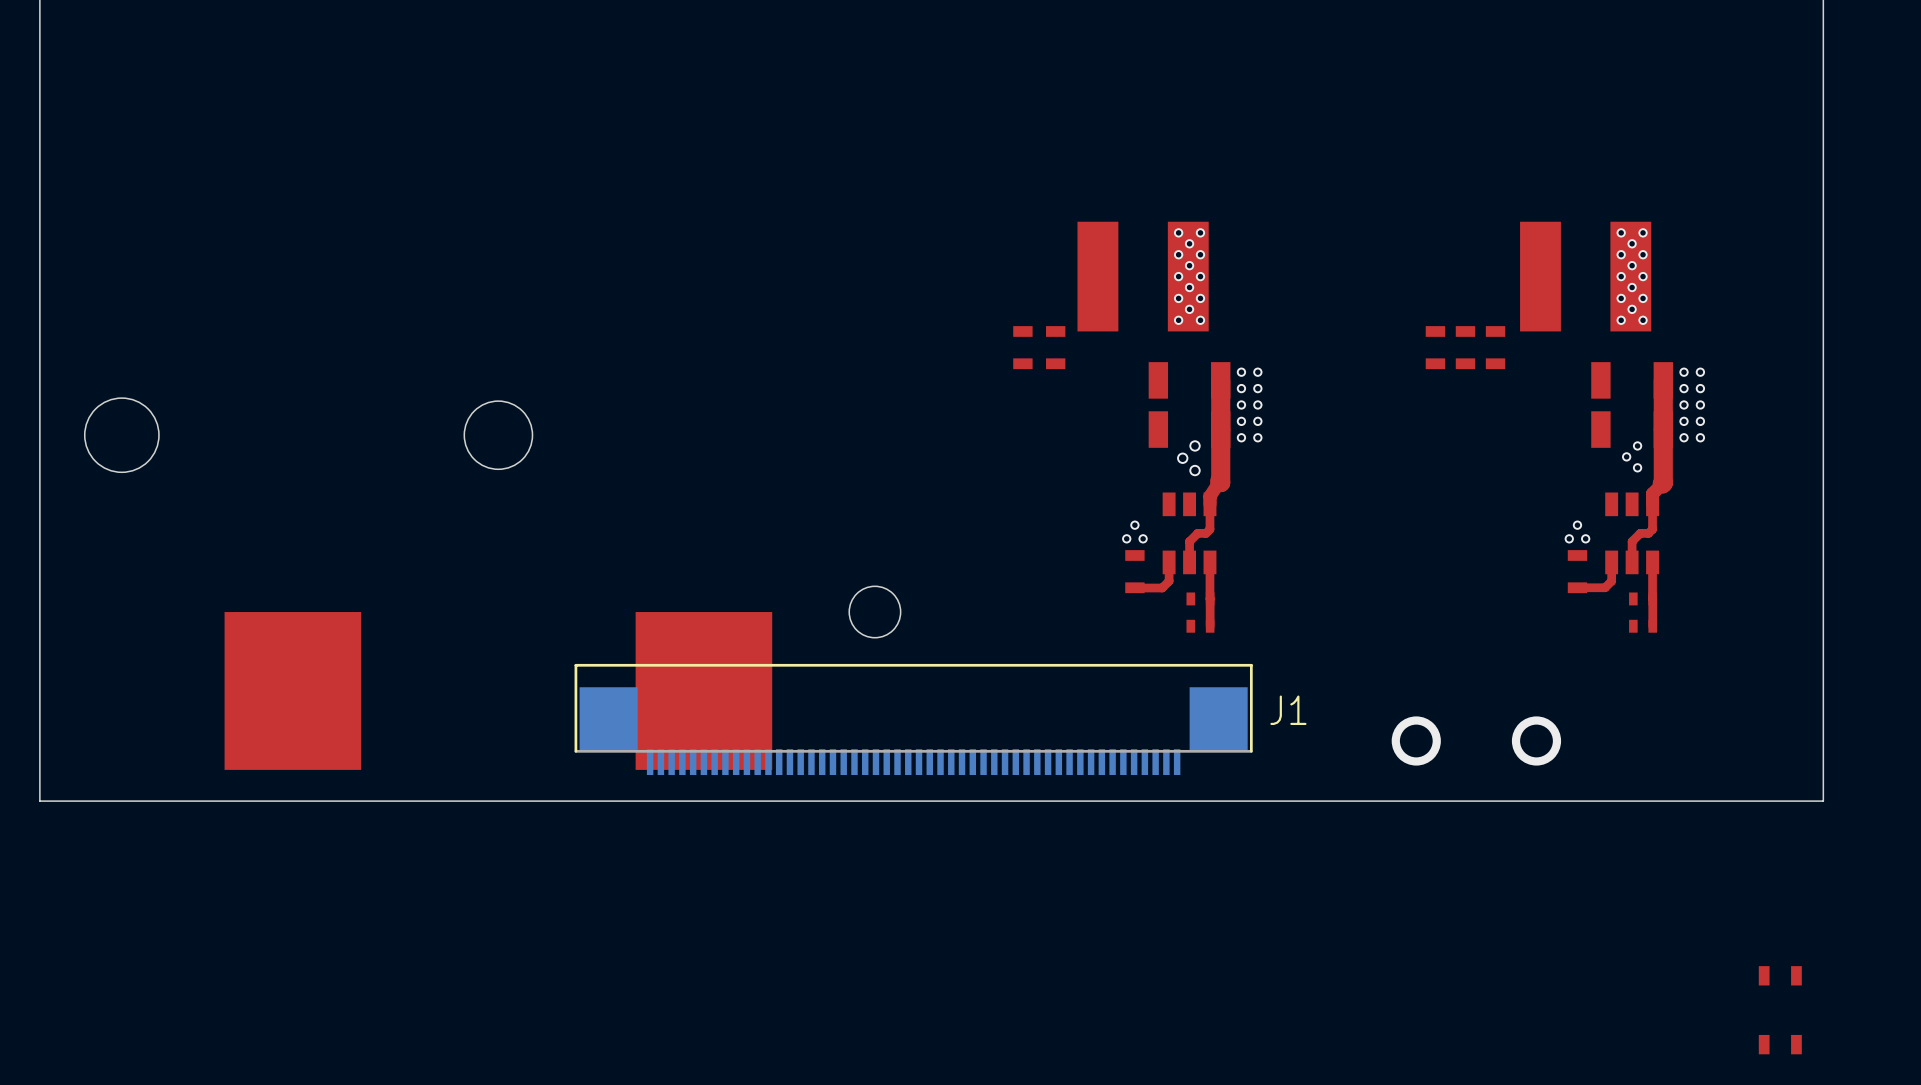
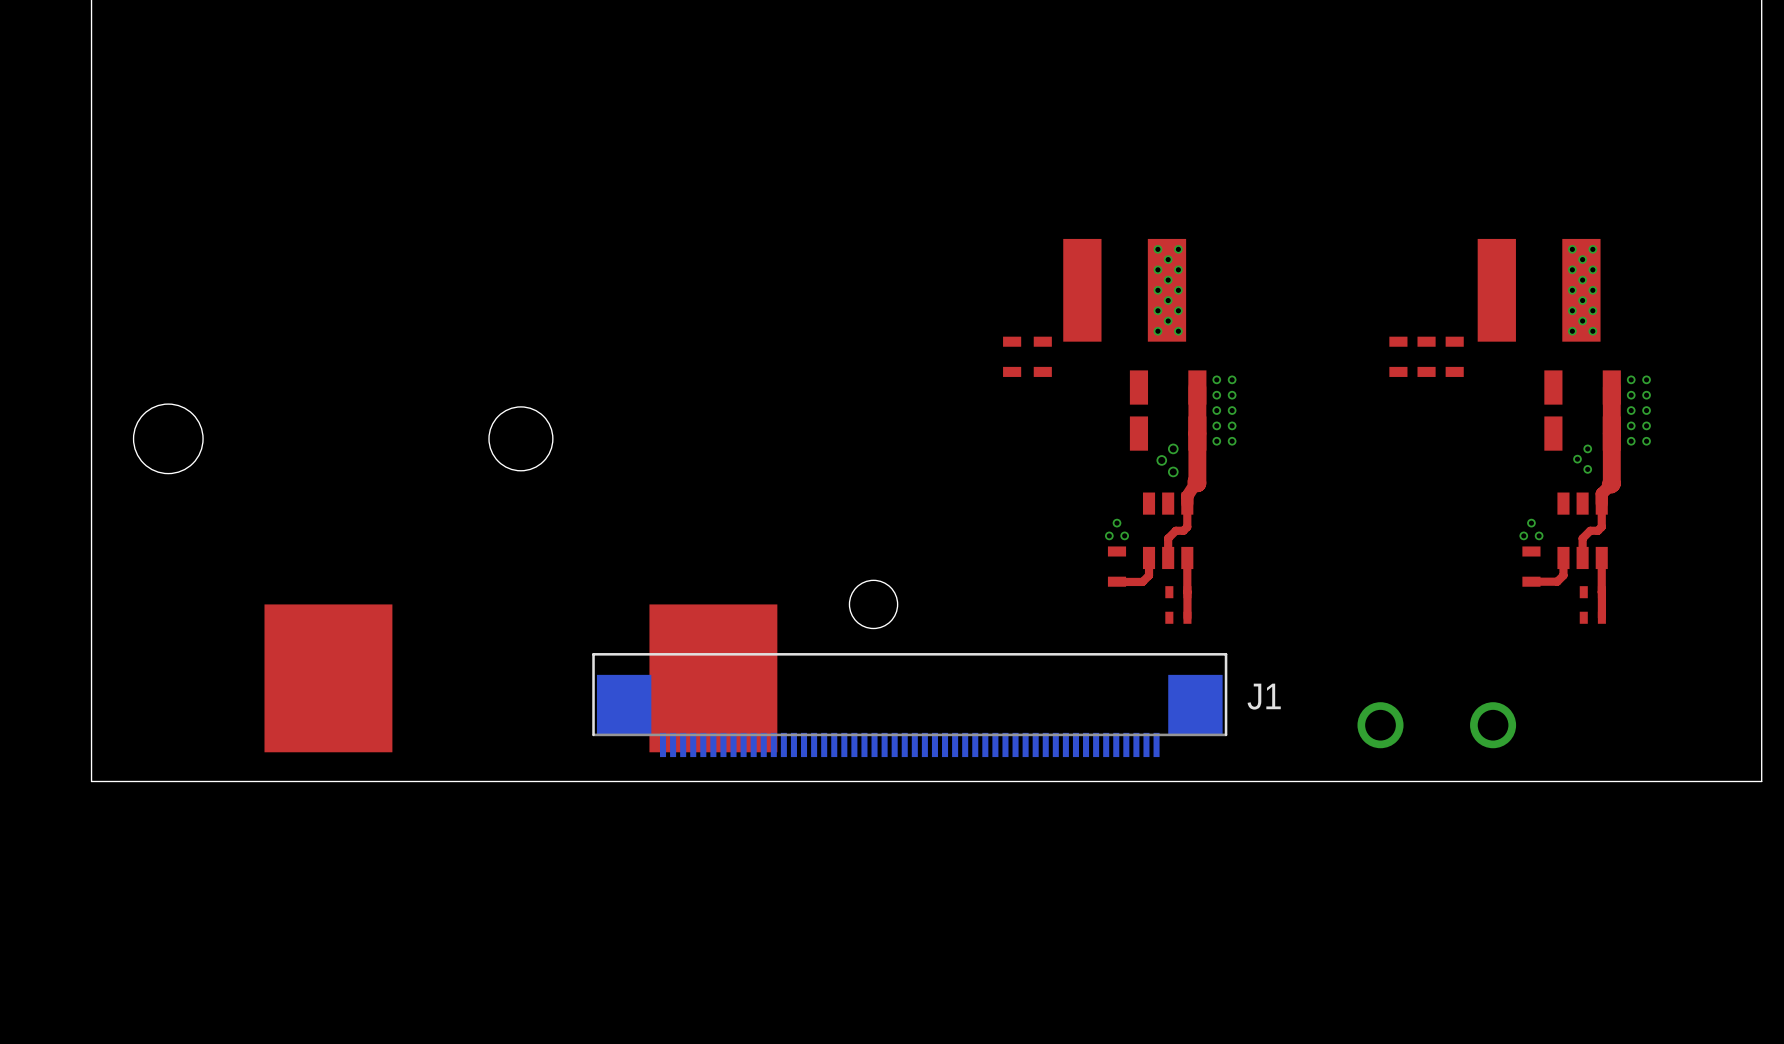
part: (1780, 975) -> none
part: (1780, 1044) -> none

